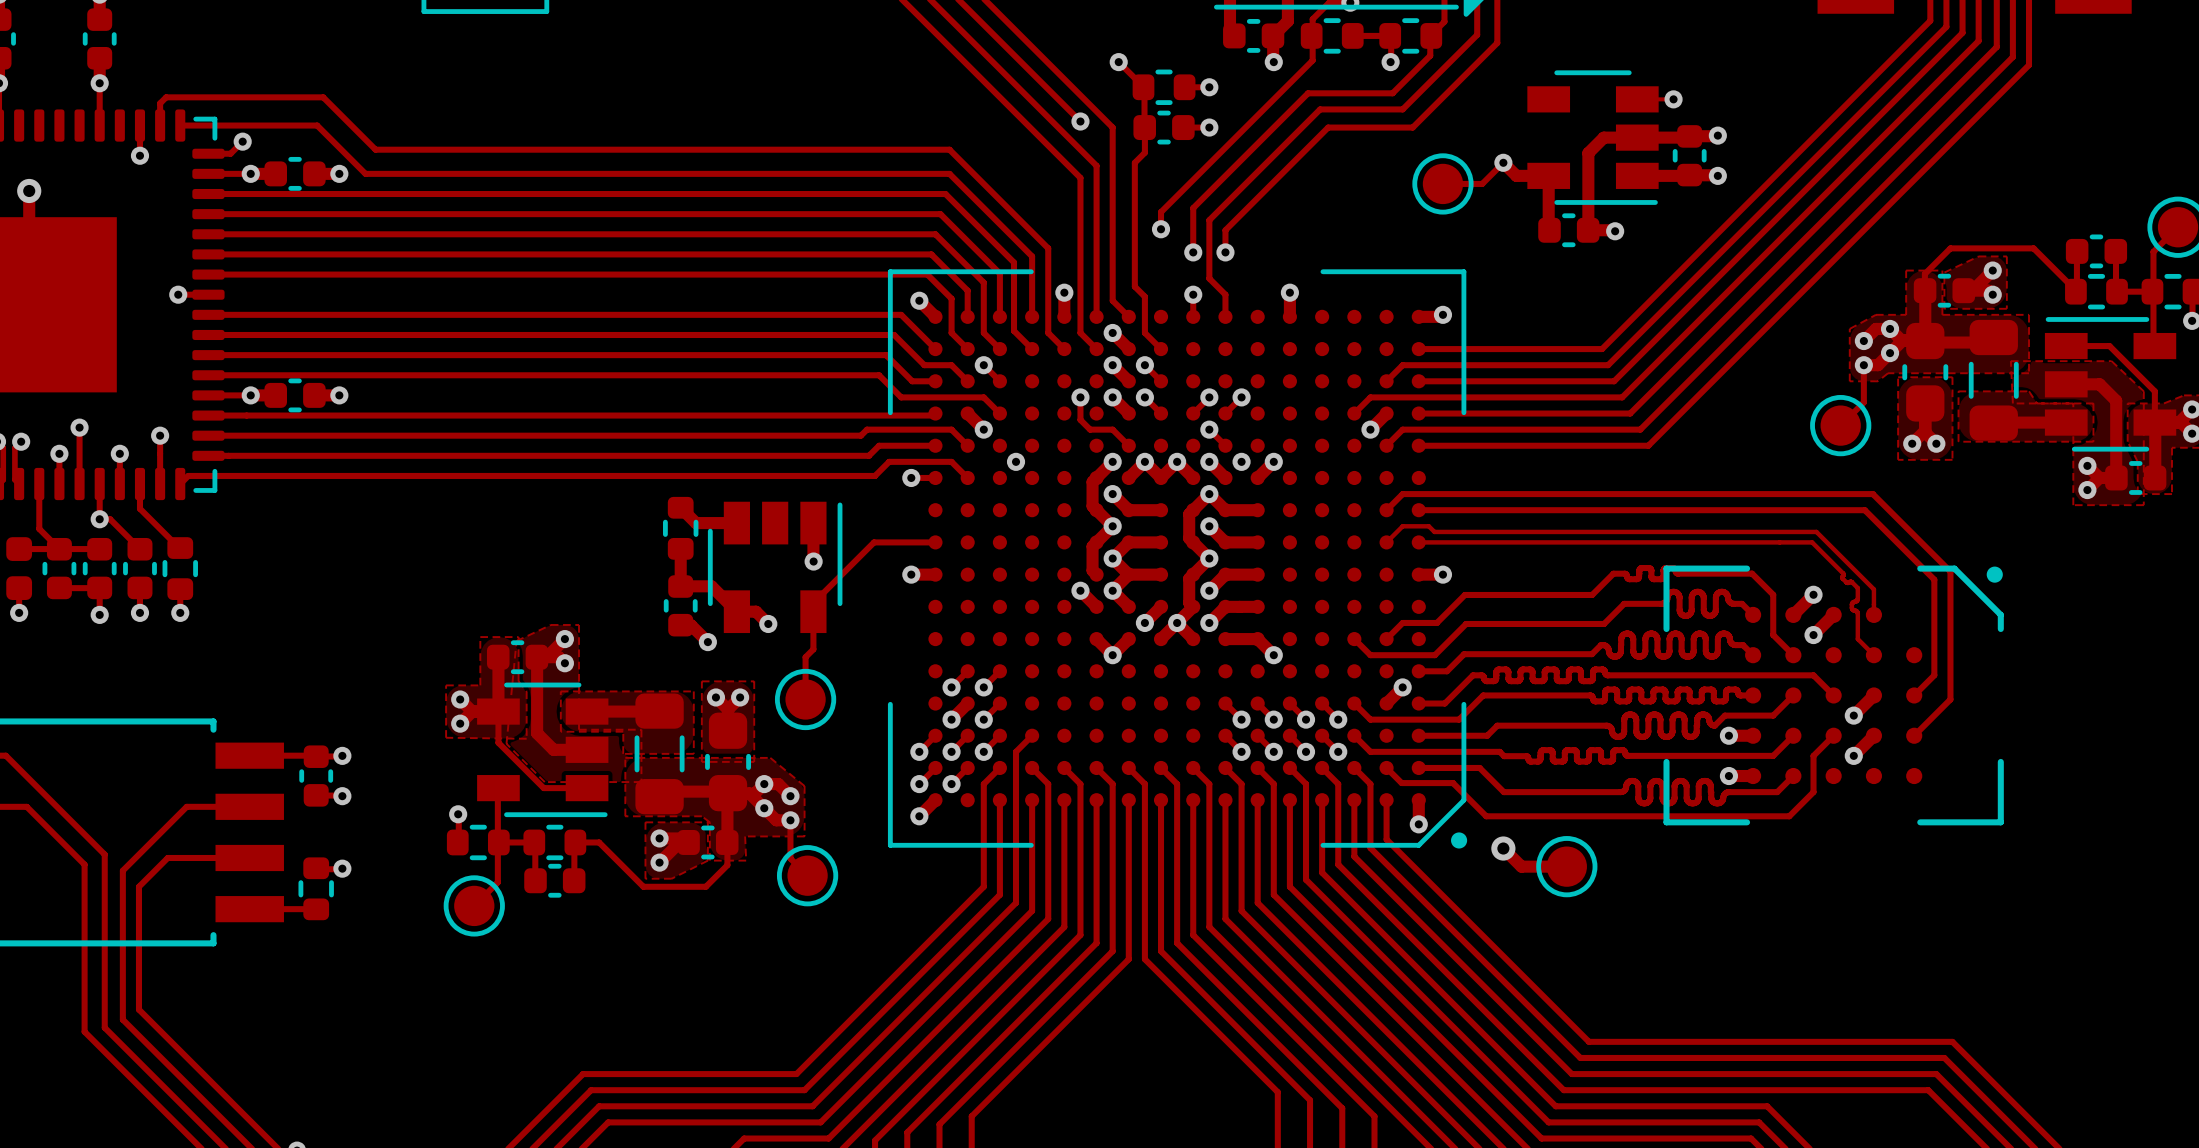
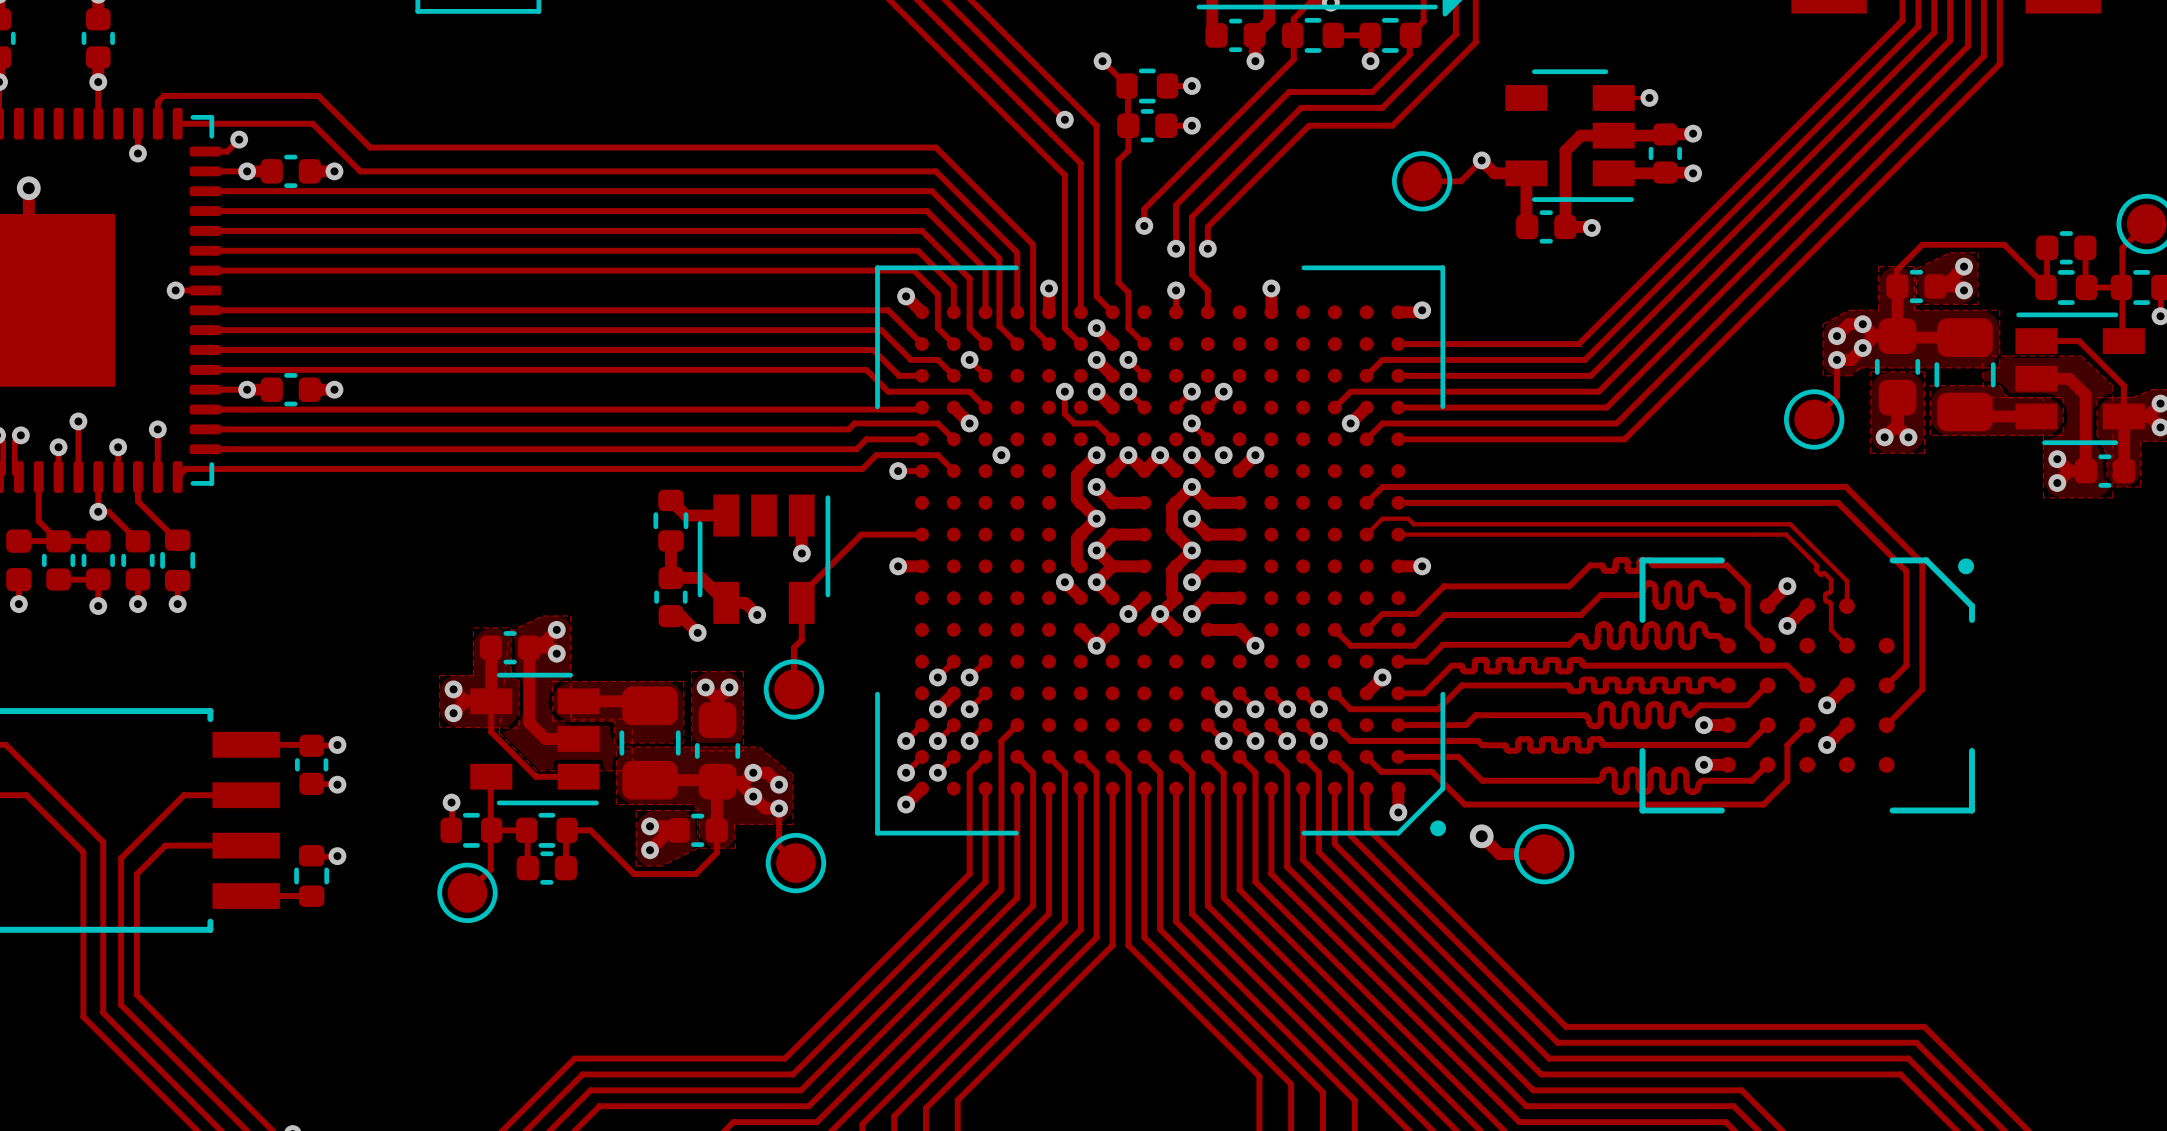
part footprint: [1968, 319, 2019, 441] -> [1934, 318, 1996, 432]
part footprint: [634, 693, 685, 815] -> [619, 686, 681, 800]

